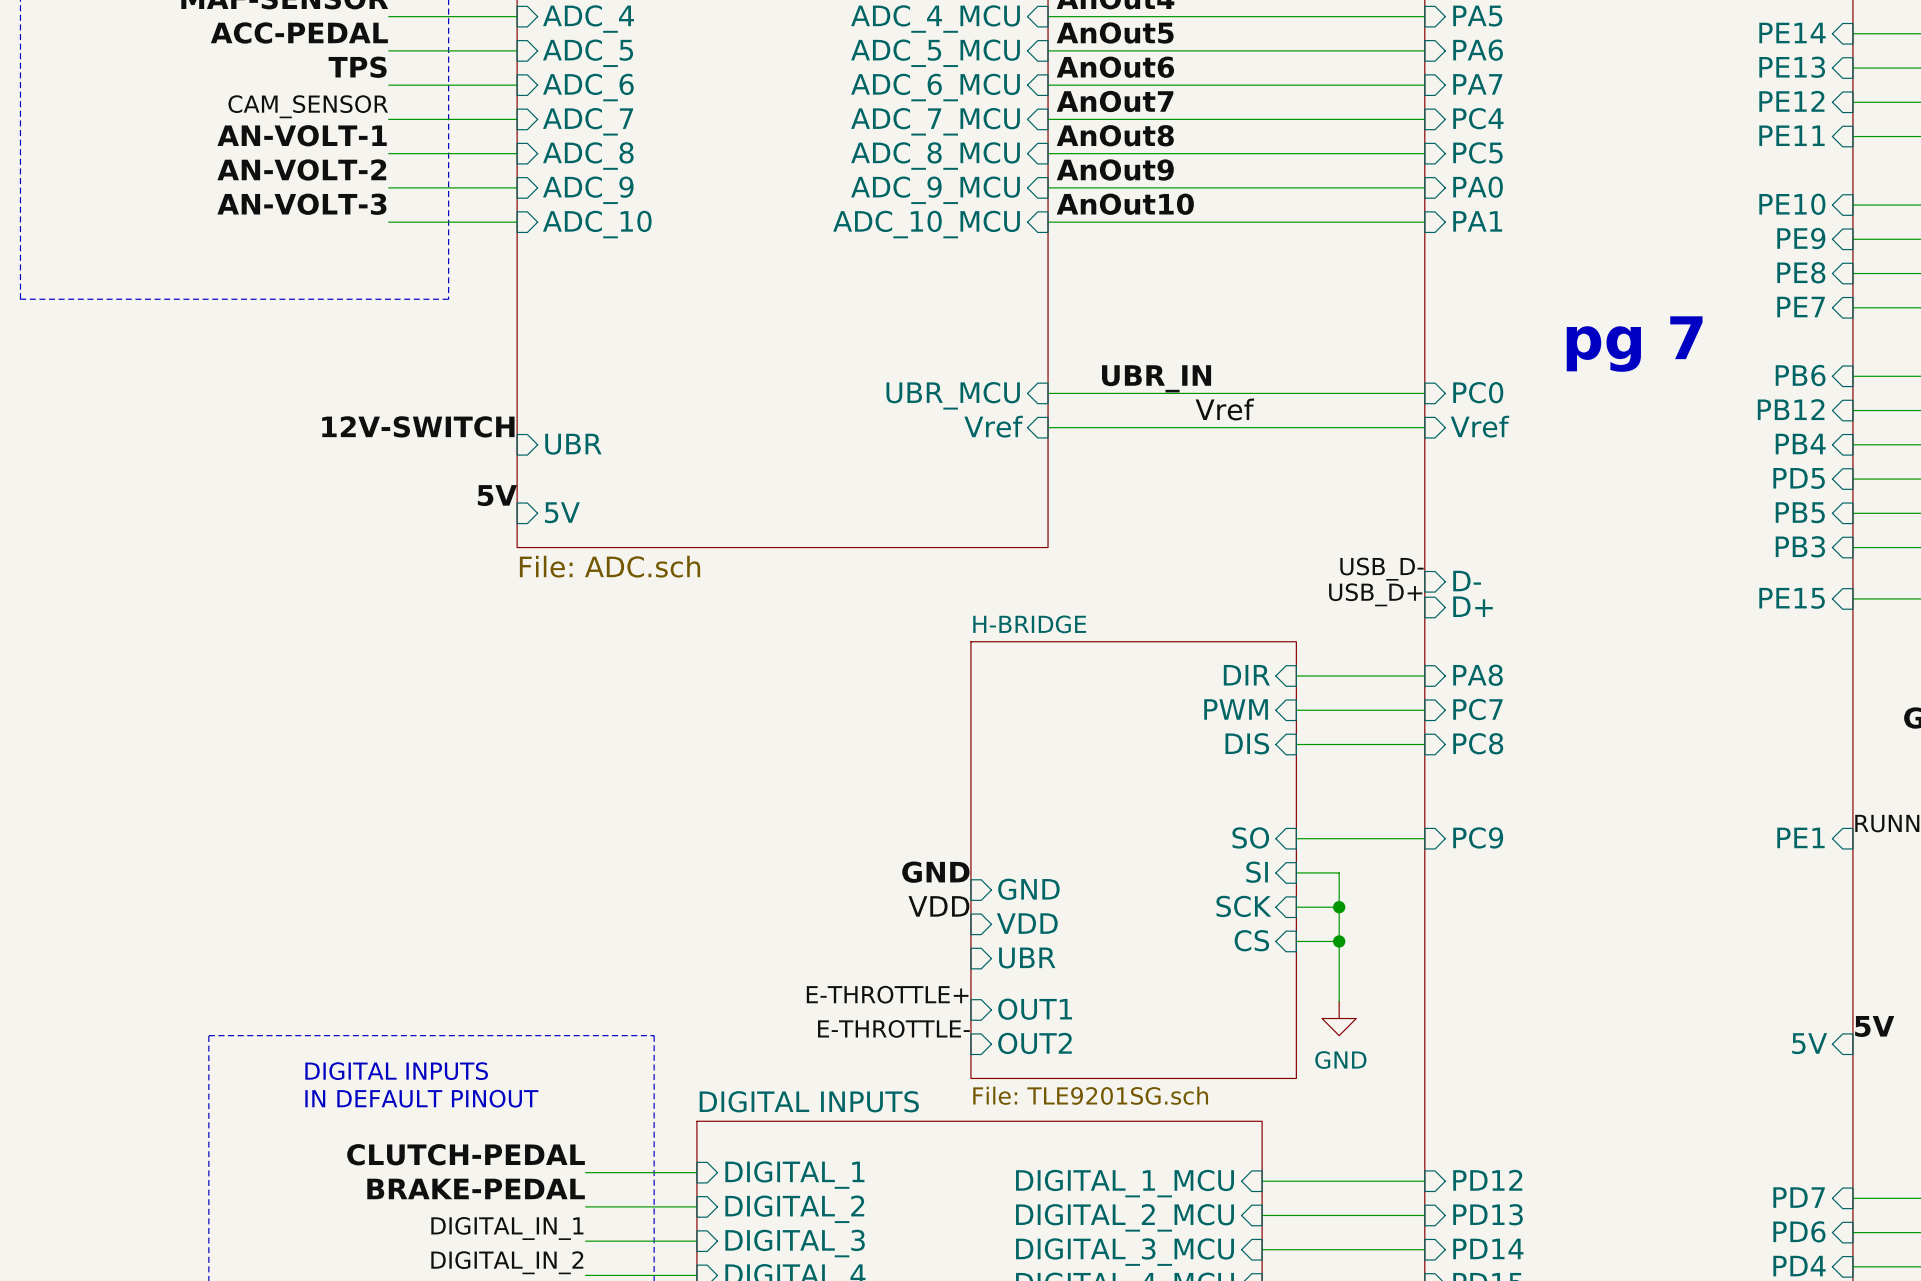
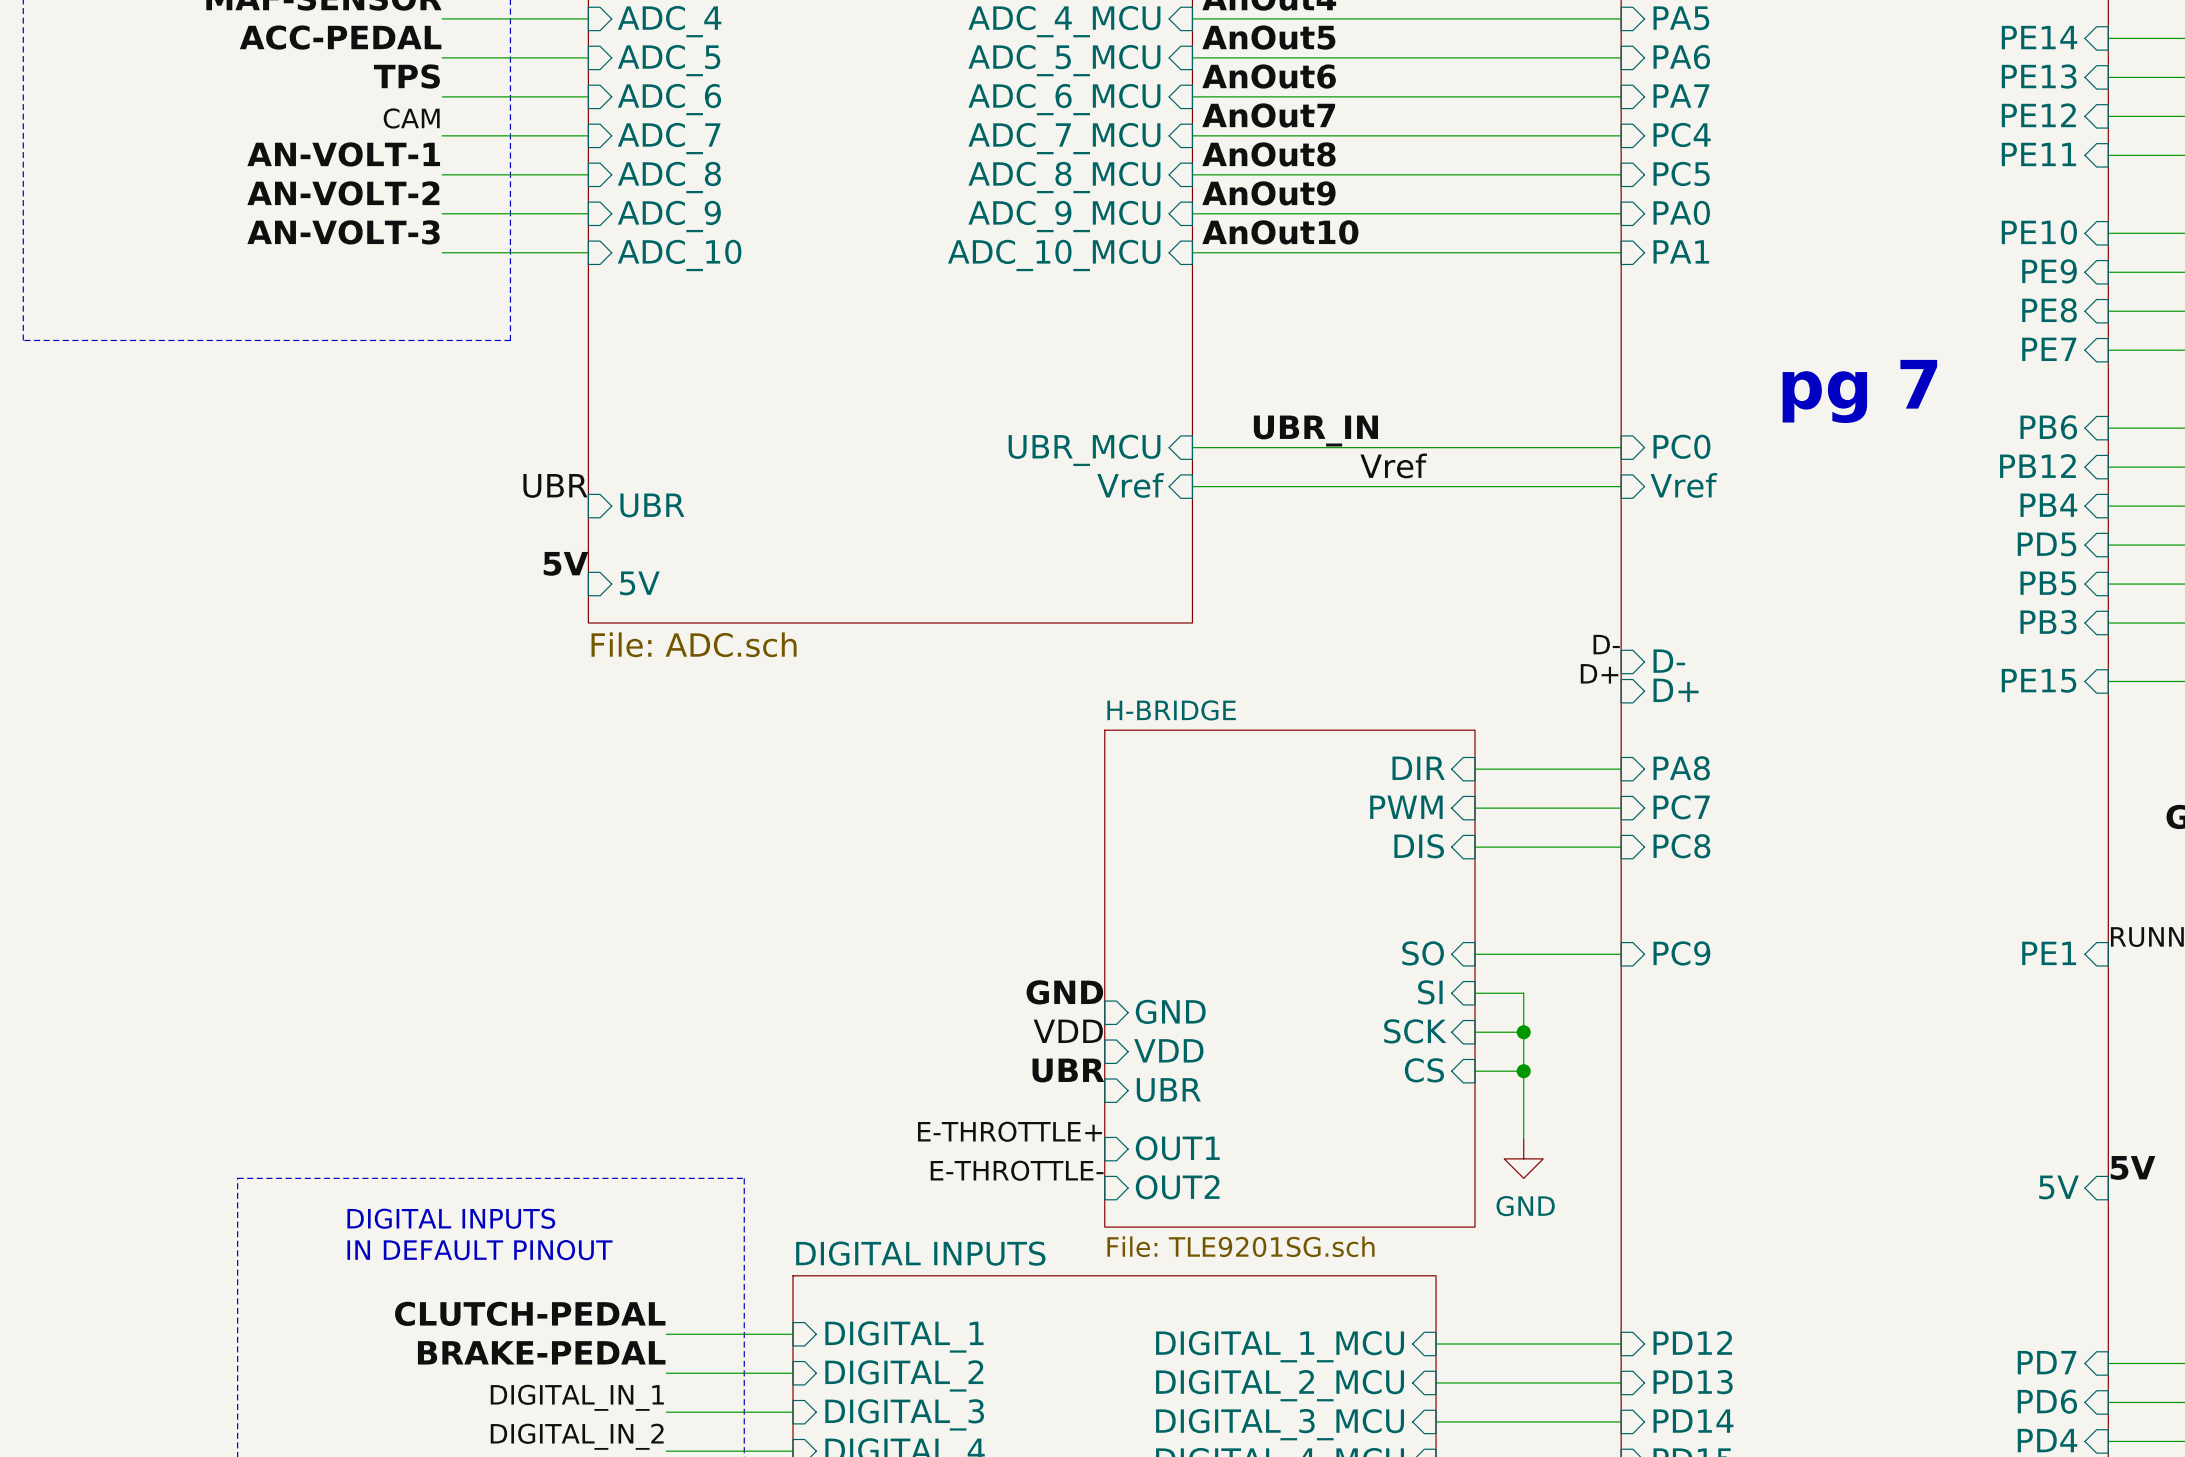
label: CAM_SENSOR (308, 106) -> CAM (411, 118)
label: 12V-SWITCH (418, 426) -> UBR (555, 485)
label: USB_D- (1381, 569) -> D- (1606, 644)
label: USB_D+ (1375, 594) -> D+ (1599, 673)
label: none -> UBR (1068, 1070)

